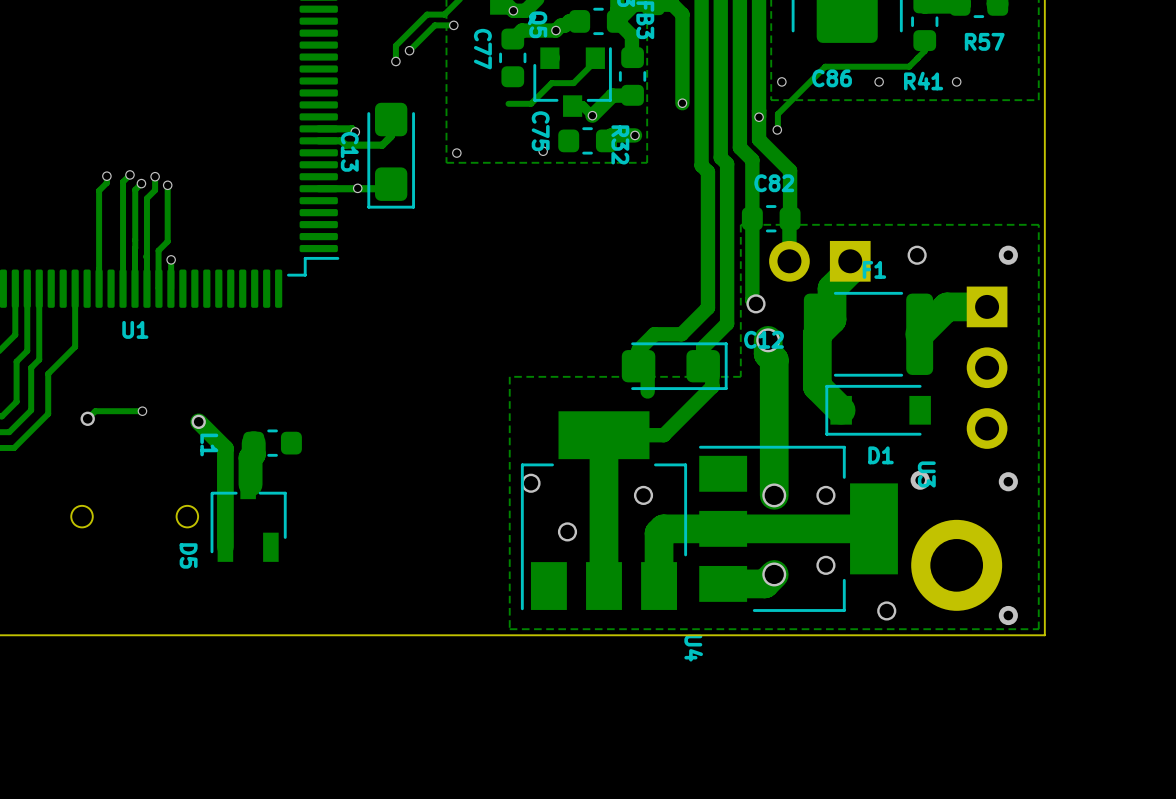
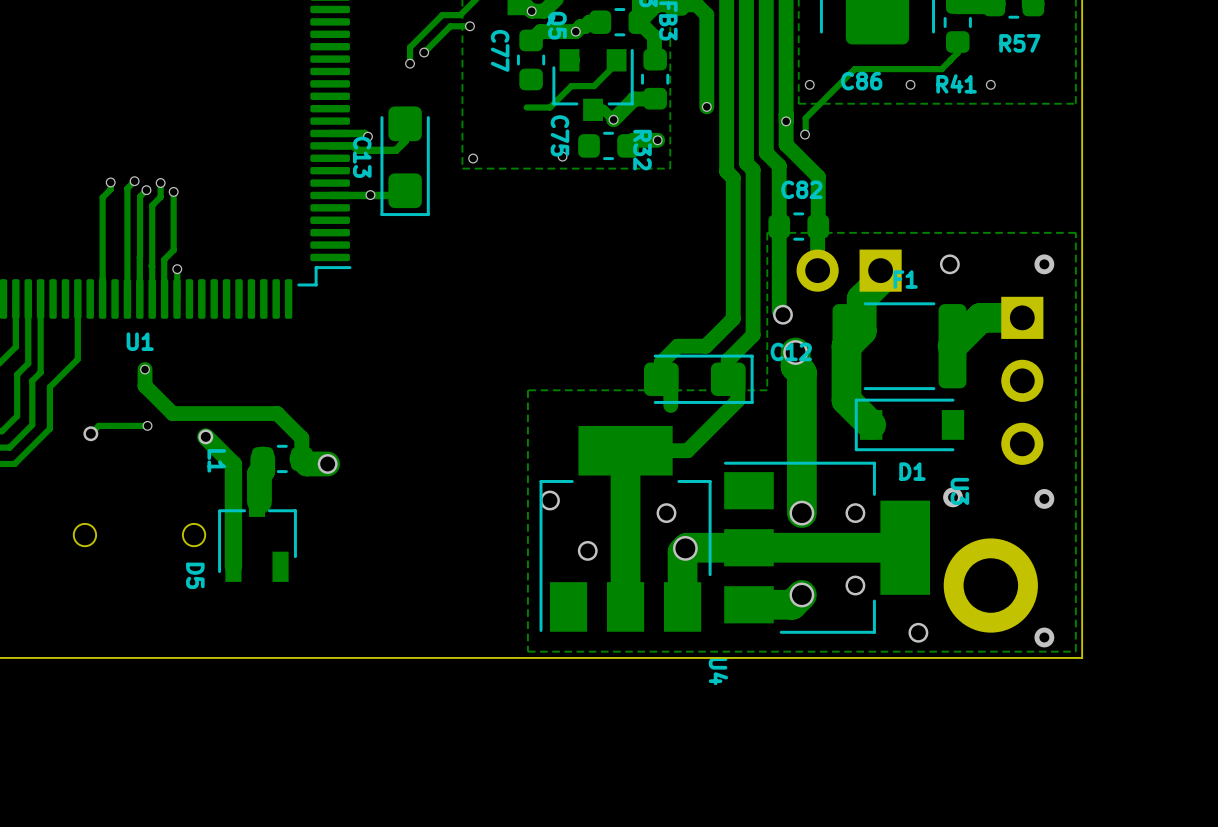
track: none -> (145, 369) (145, 385) (172, 413) (277, 413) (301, 438) (301, 458) (306, 463) (327, 463)
via: none -> (145, 369)
via: none -> (327, 463)
via: none -> (685, 548)

